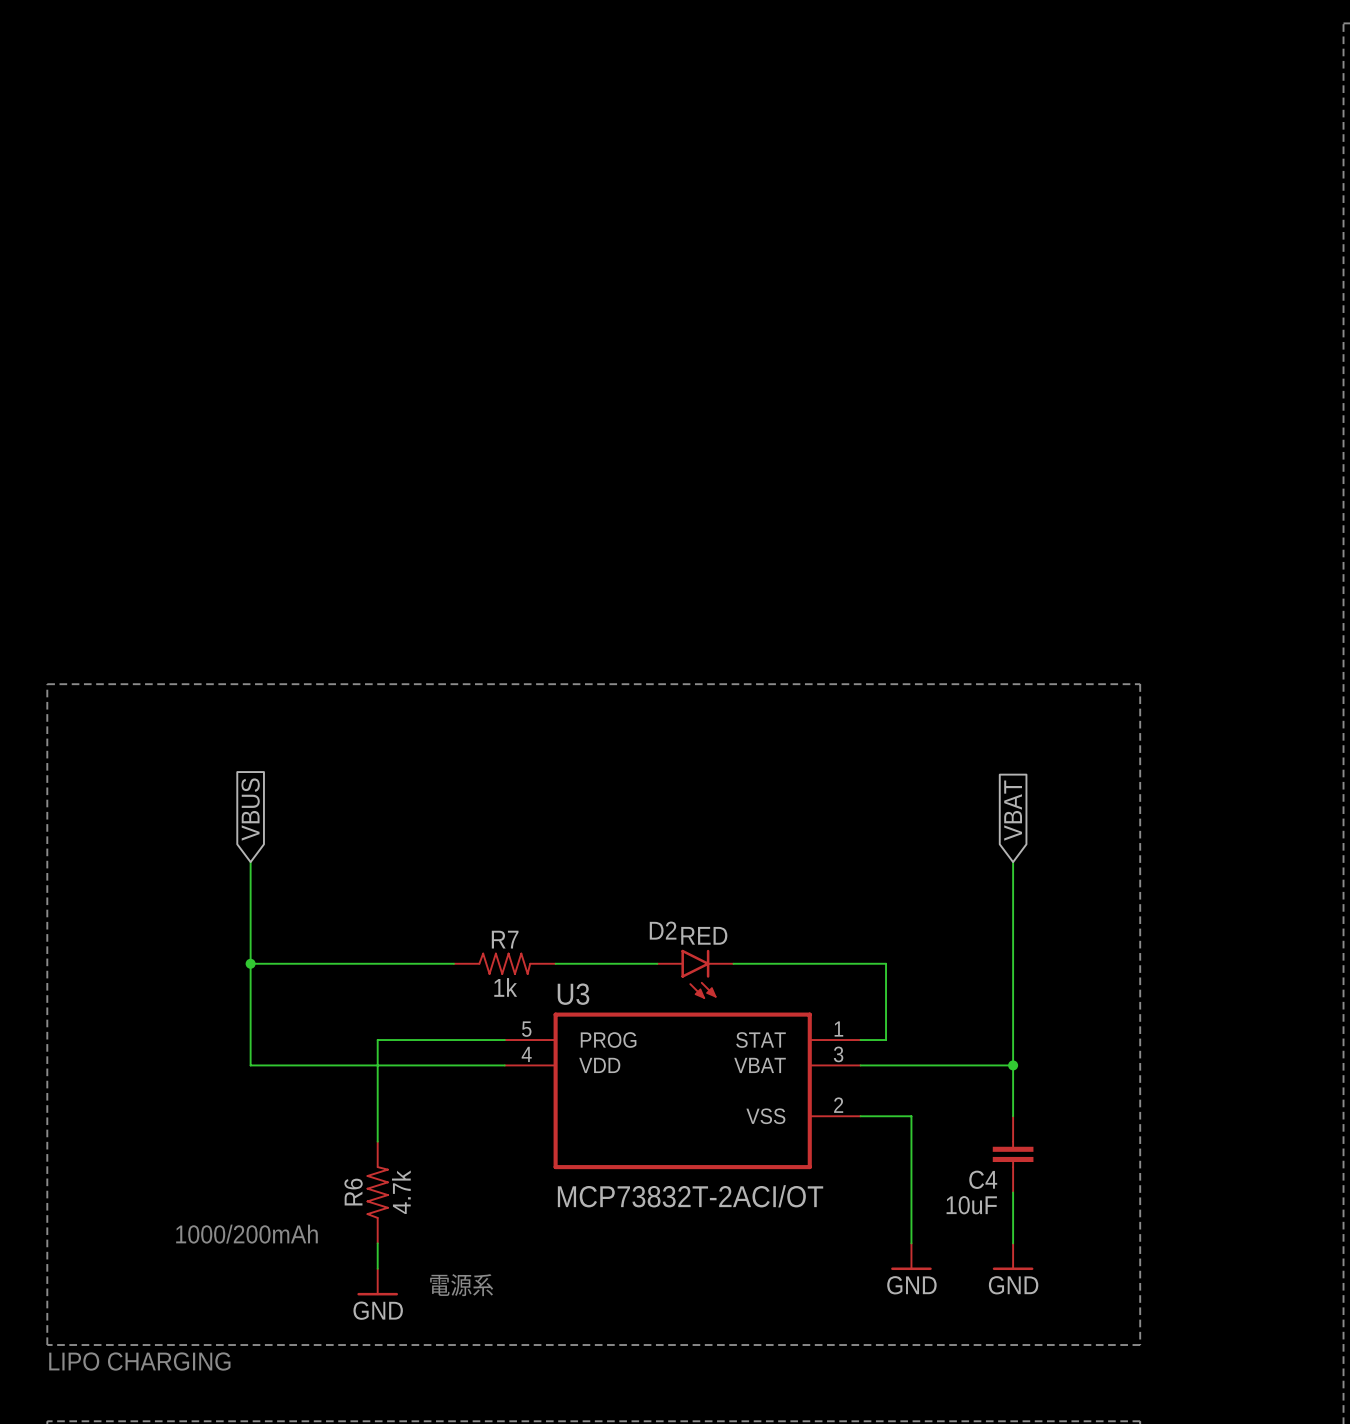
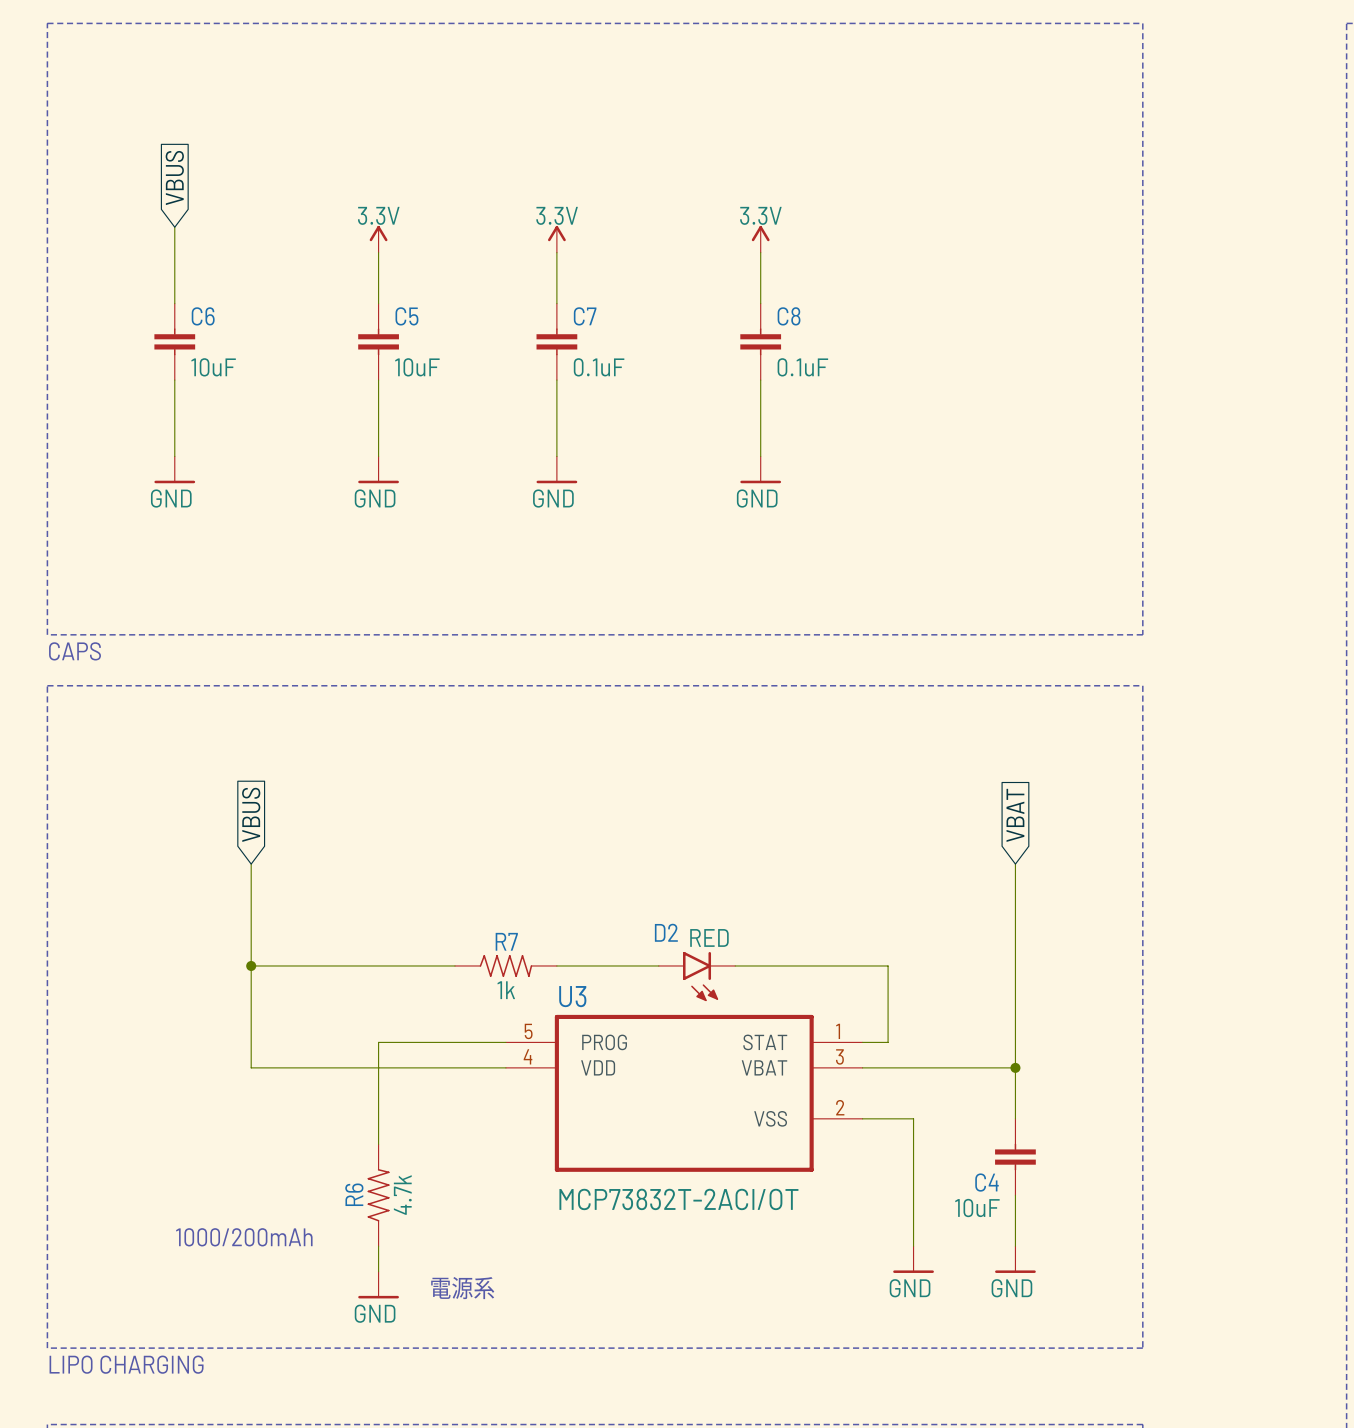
line: none -> (47, 23) (1142, 23) (1142, 634) (47, 634) (47, 23)
global label: none -> VBUS (174, 177)
wire: none -> (174, 227) (174, 303)
power symbol: none -> 3.3V (378, 239)
power symbol: none -> 3.3V (556, 239)
power symbol: none -> 3.3V (760, 239)
wire: none -> (378, 252) (378, 303)
wire: none -> (556, 252) (556, 303)
wire: none -> (760, 252) (760, 303)
C6: none -> 10uF (174, 341)
C5: none -> 10uF (378, 341)
C7: none -> 0.1uF (556, 341)
C8: none -> 0.1uF (760, 341)
wire: none -> (174, 380) (174, 456)
wire: none -> (378, 380) (378, 456)
wire: none -> (556, 380) (556, 456)
wire: none -> (760, 380) (760, 456)
power symbol: none -> GND (174, 469)
power symbol: none -> GND (378, 469)
power symbol: none -> GND (556, 469)
power symbol: none -> GND (760, 469)
text: none -> CAPS (75, 651)

